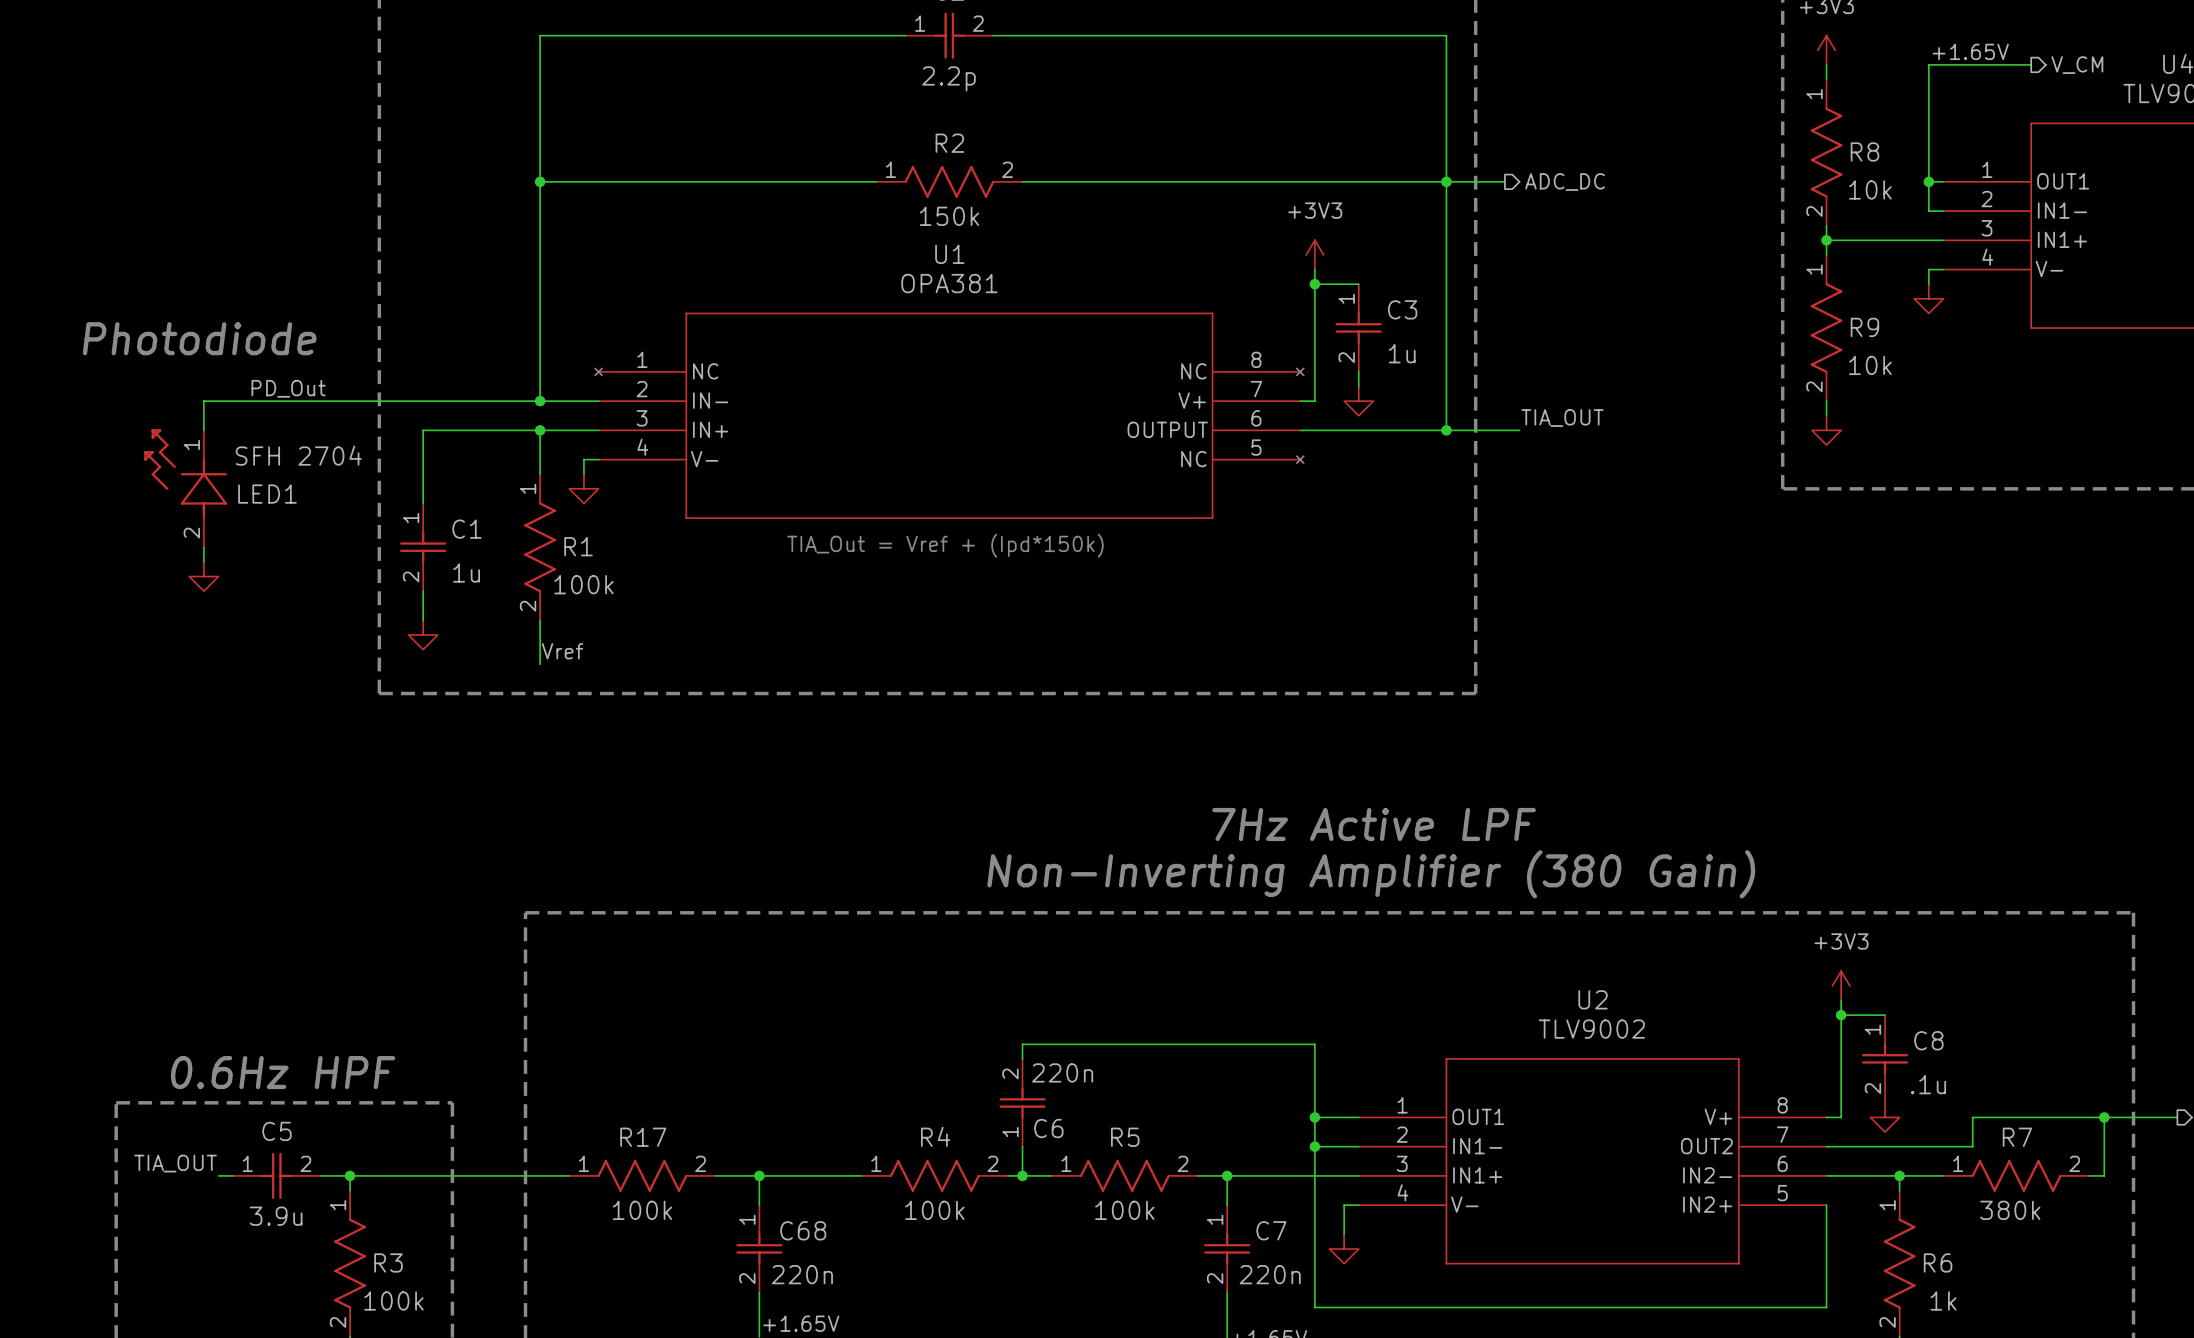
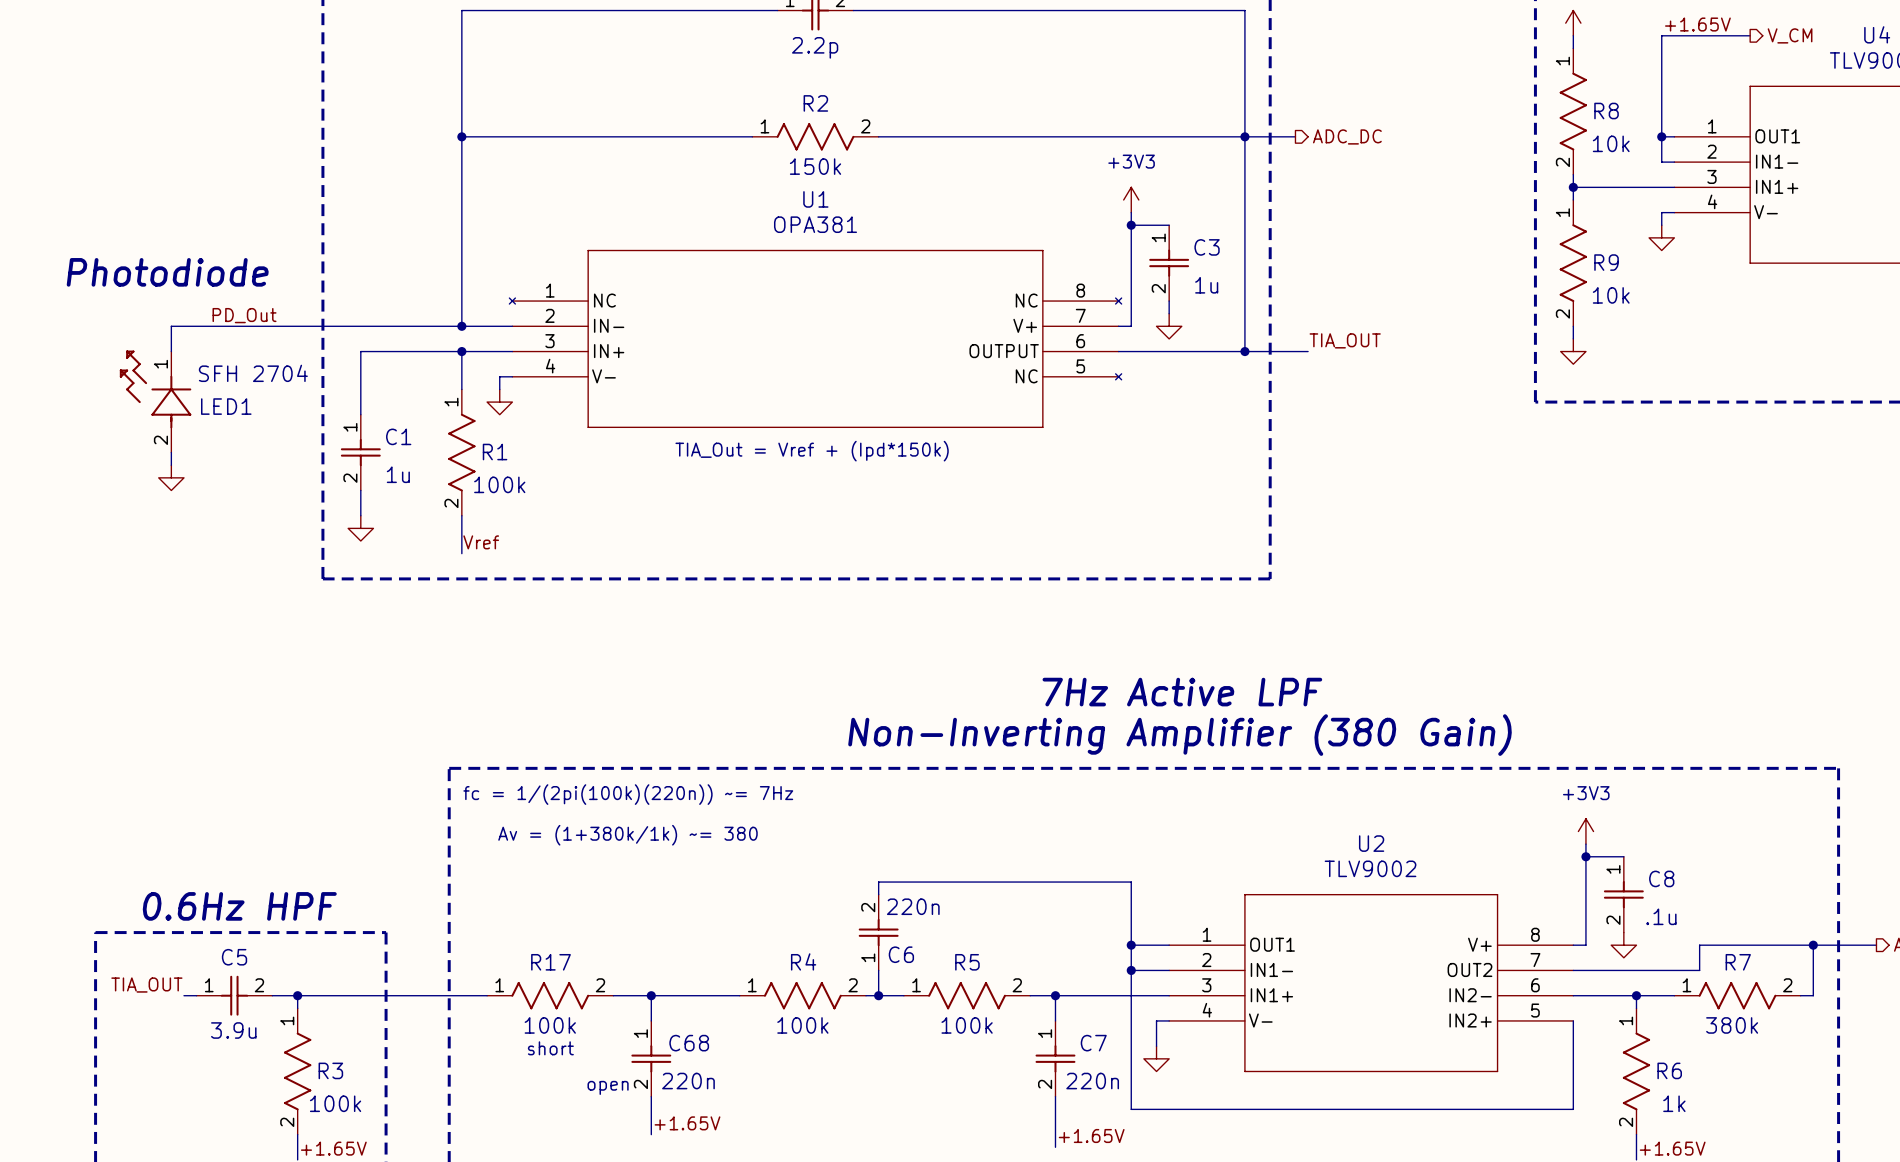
text: none -> fc = 1/(2pi(100k)(220n)) ~= 7Hz (628, 794)
text: none -> Av = (1+380k/1k) ~= 380 (627, 835)
text: none -> short (550, 1048)
text: none -> open (608, 1087)

